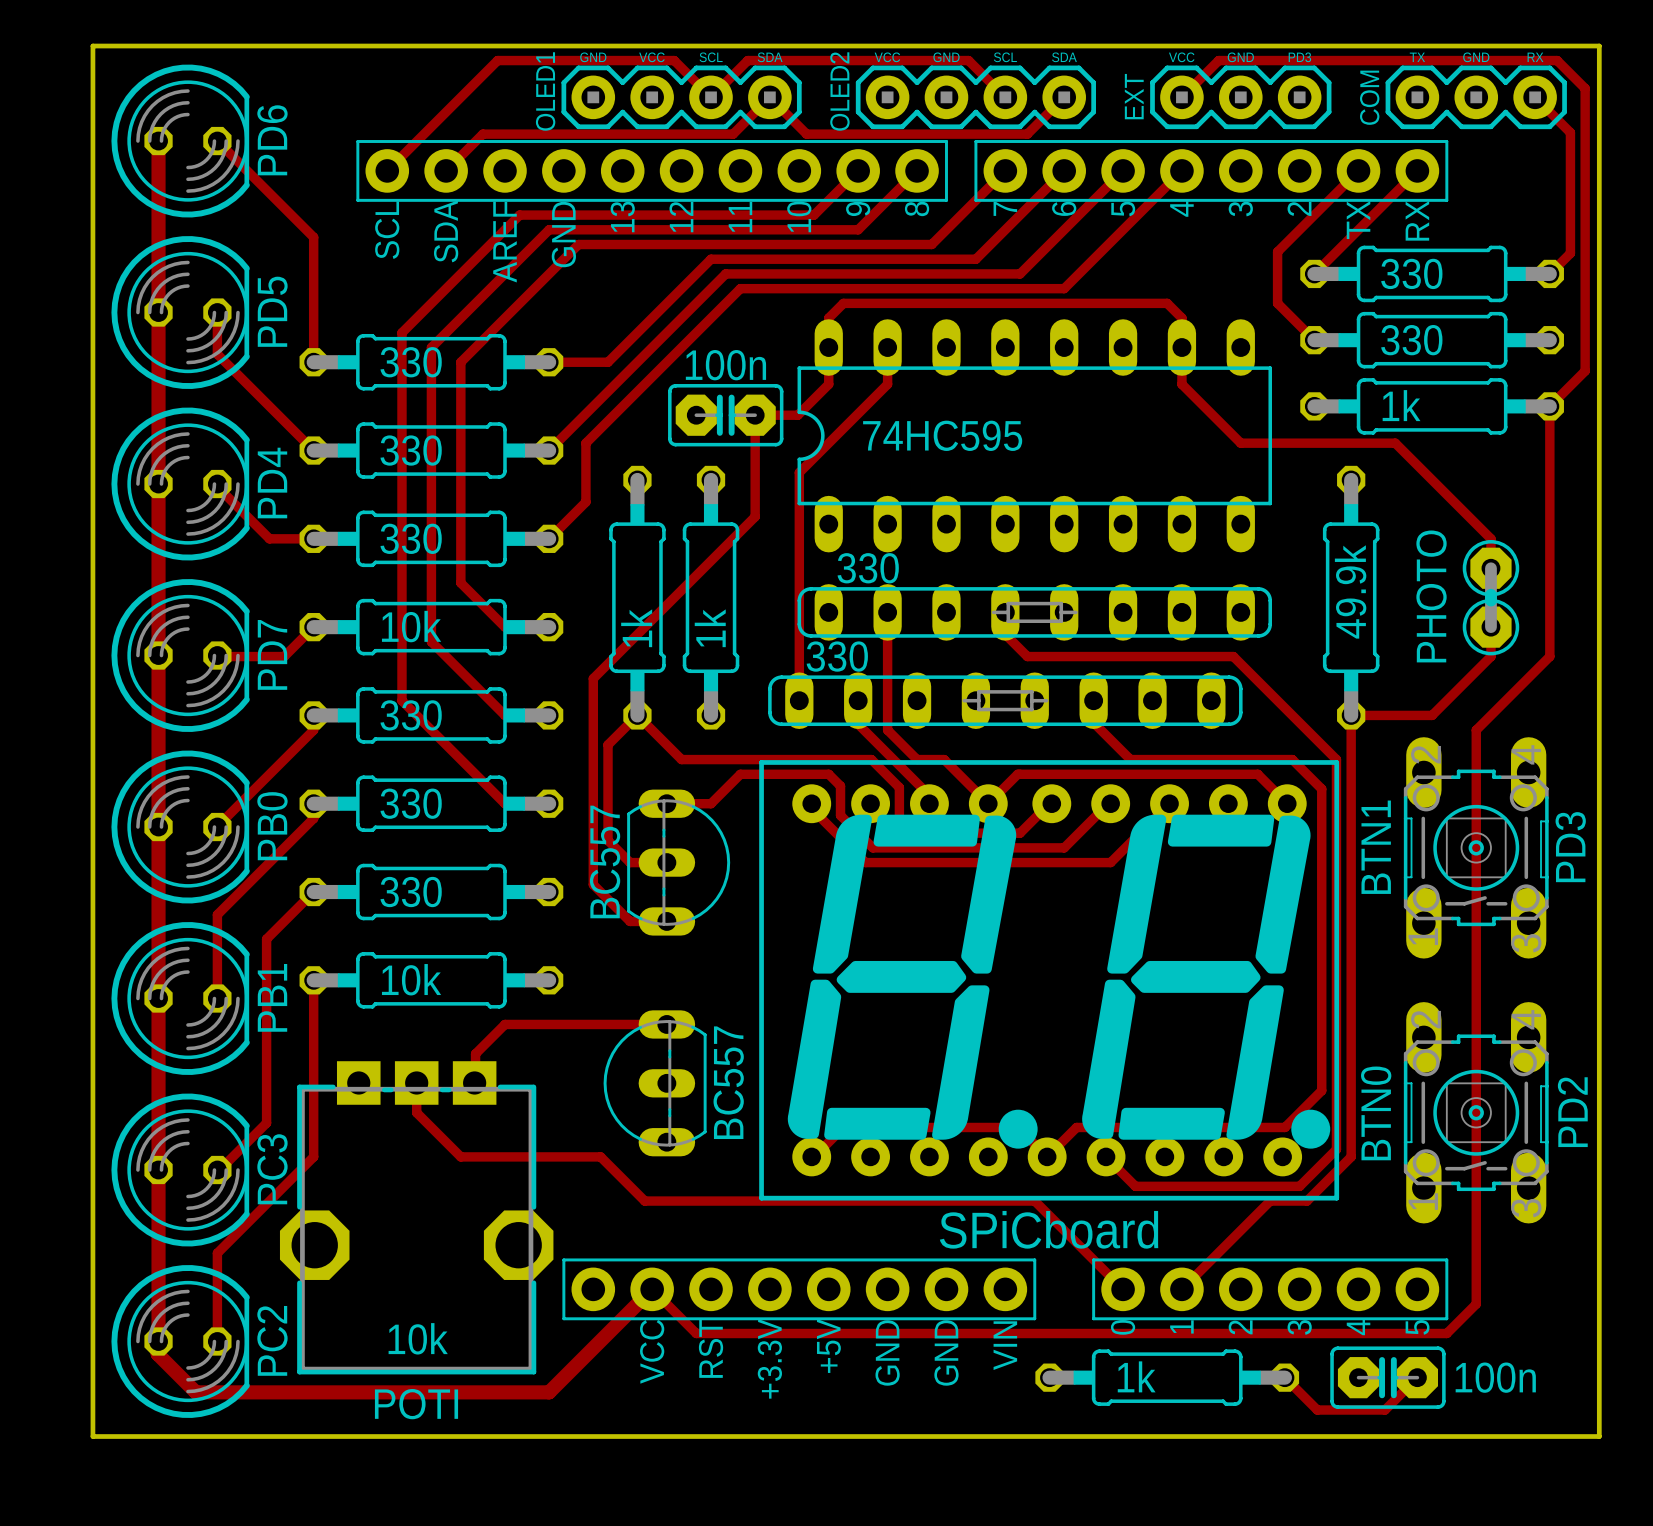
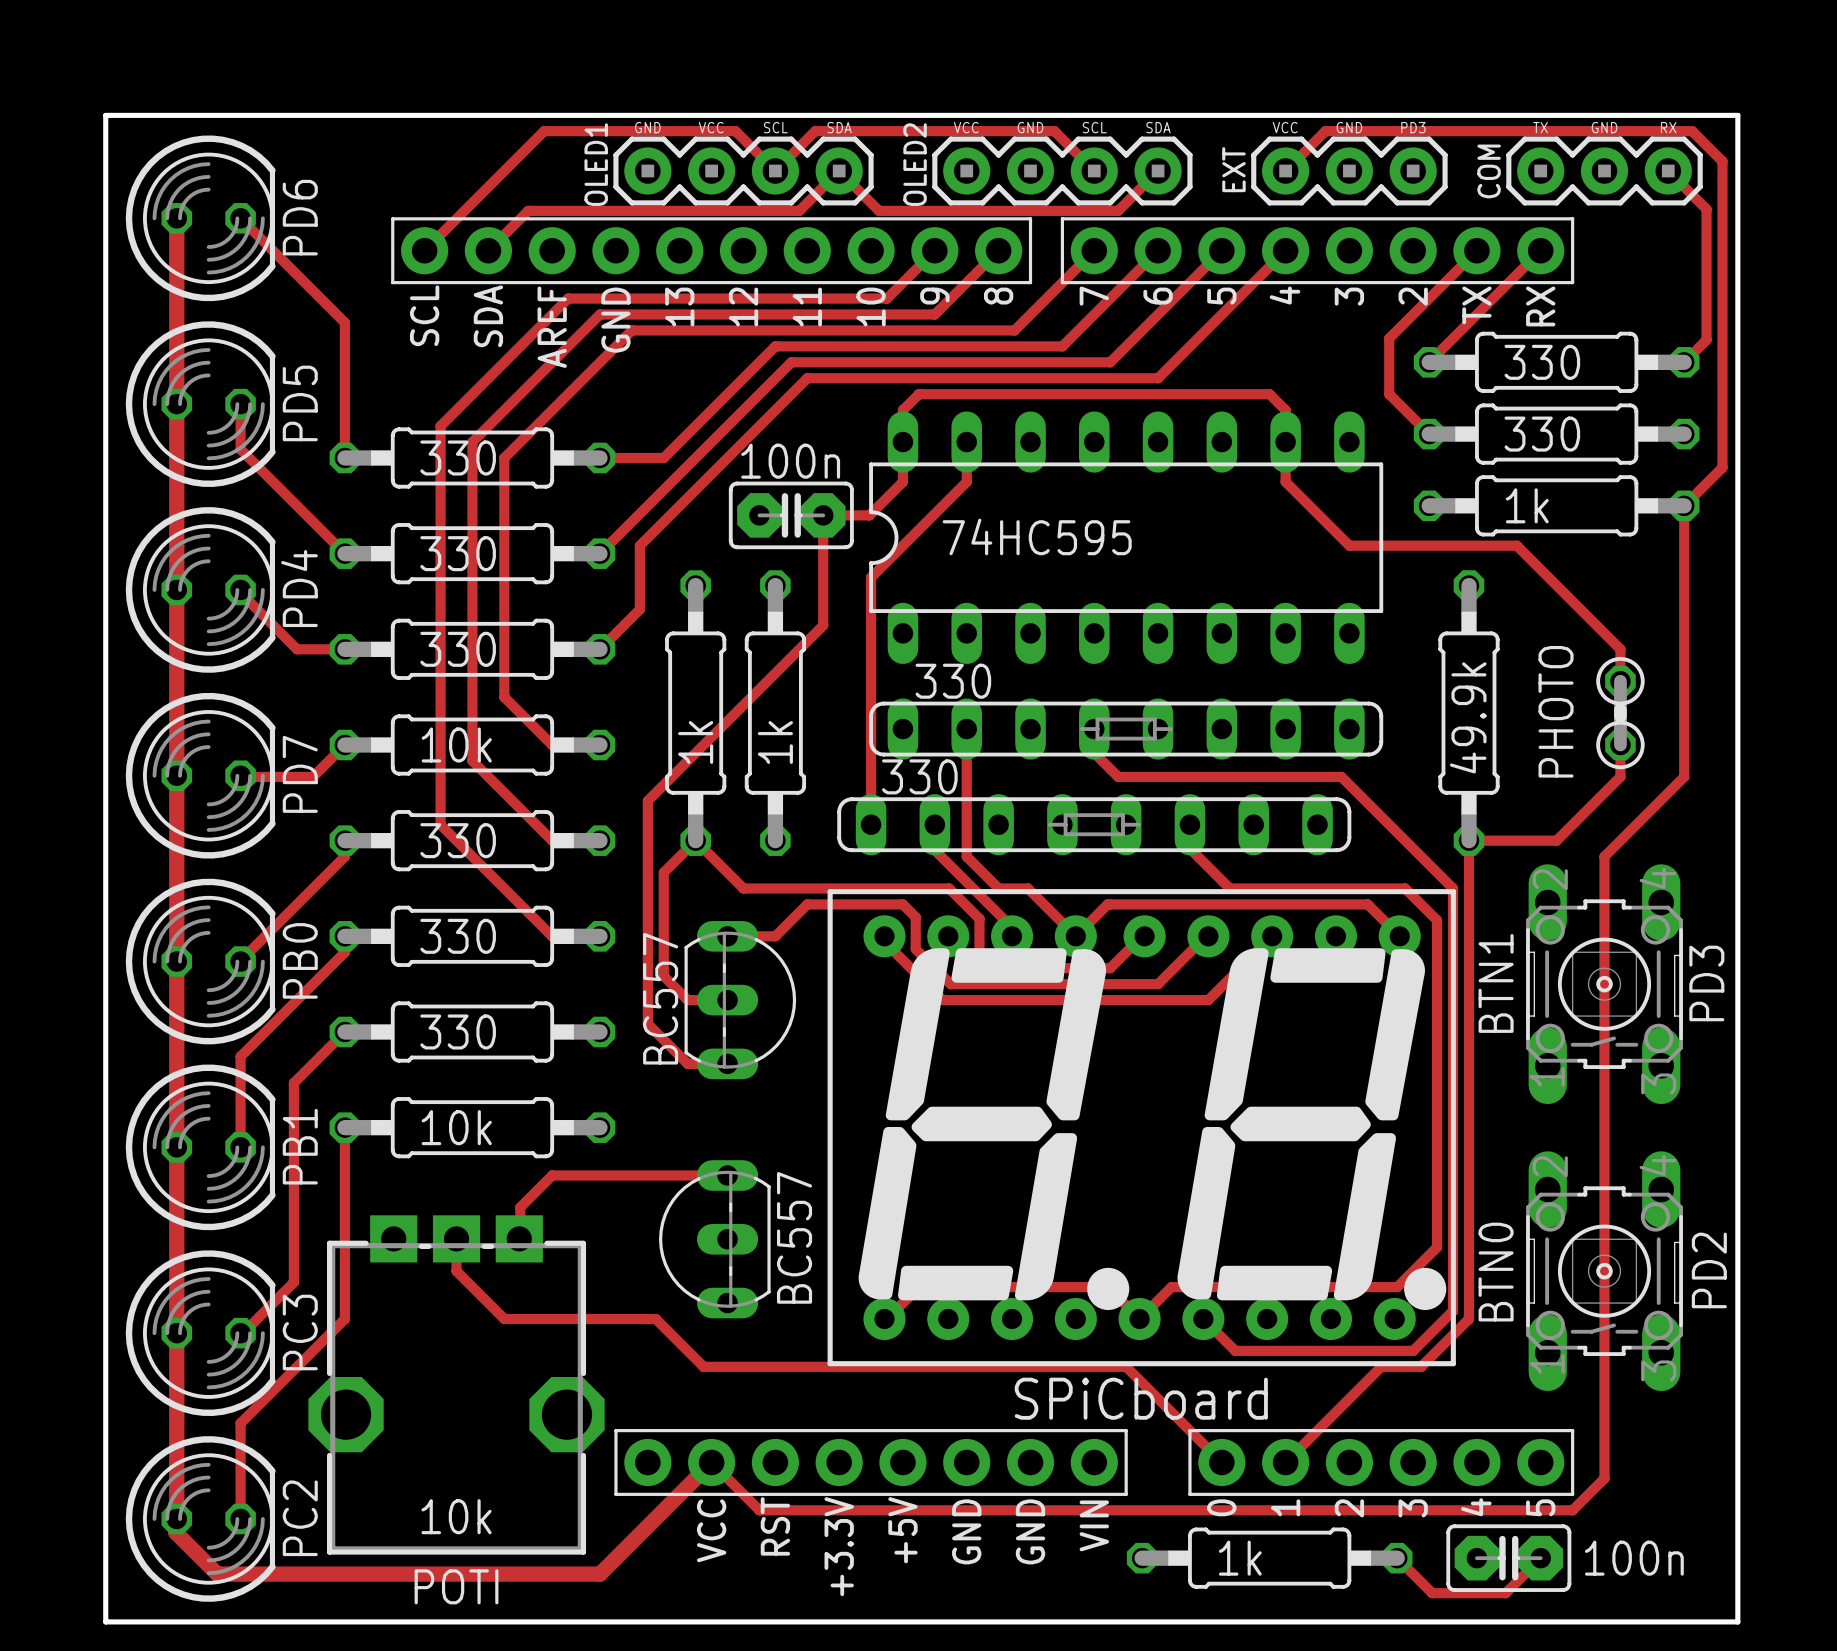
PHOTO footprint: [1462, 540, 1520, 656] -> [1596, 656, 1645, 770]

